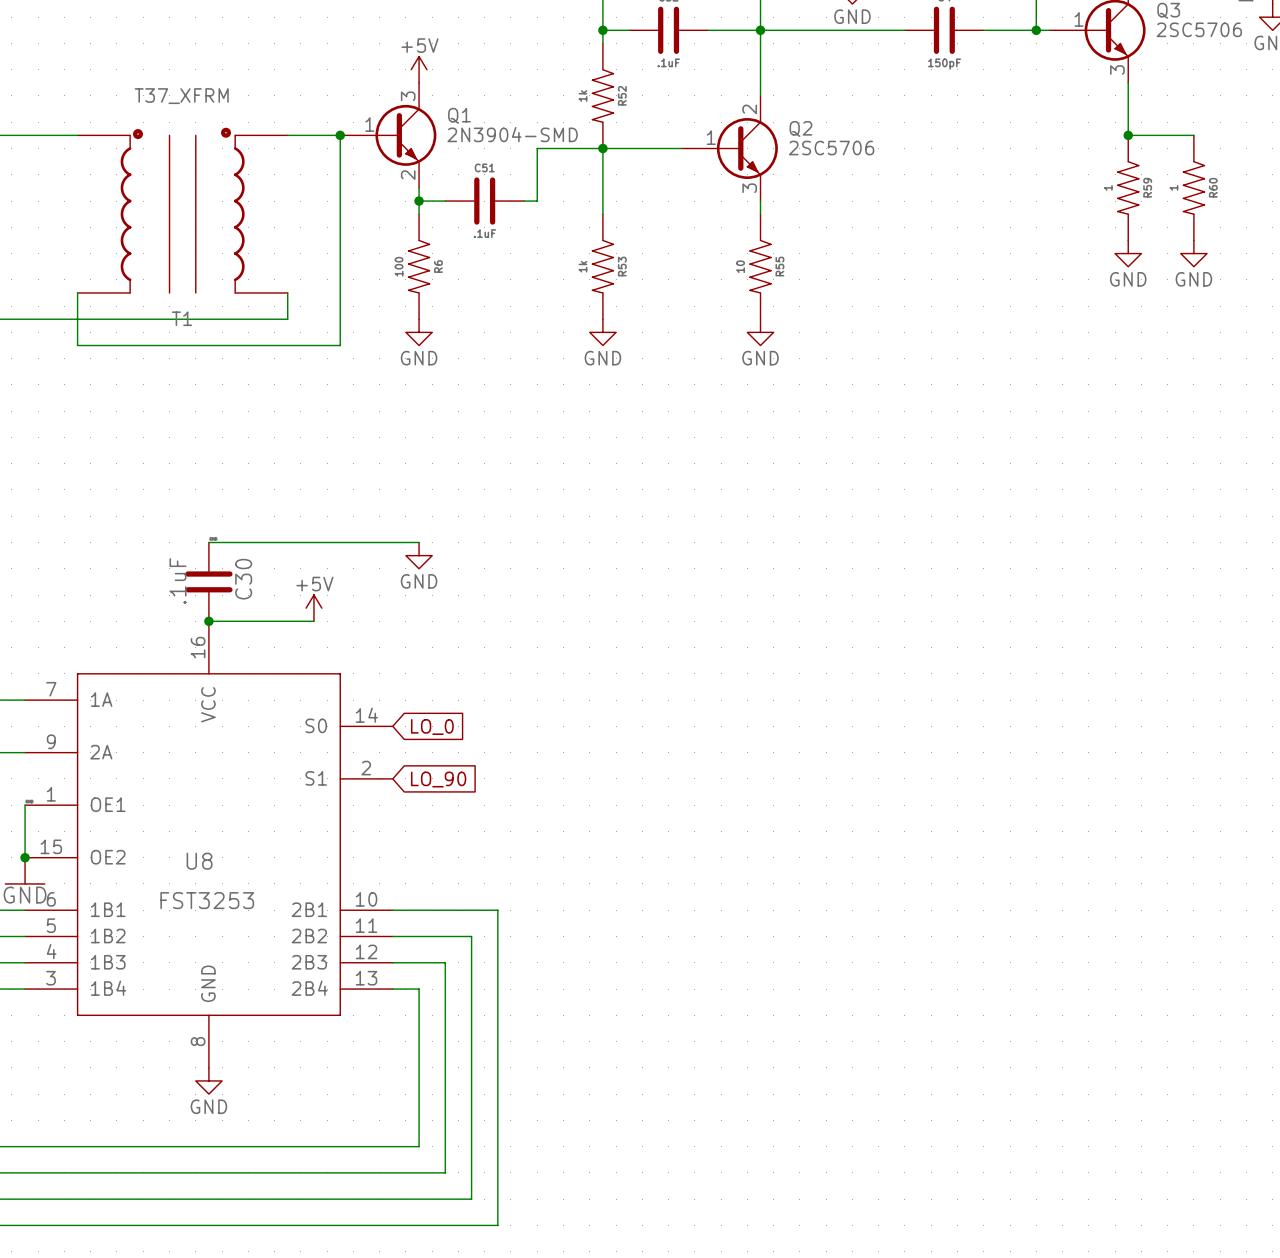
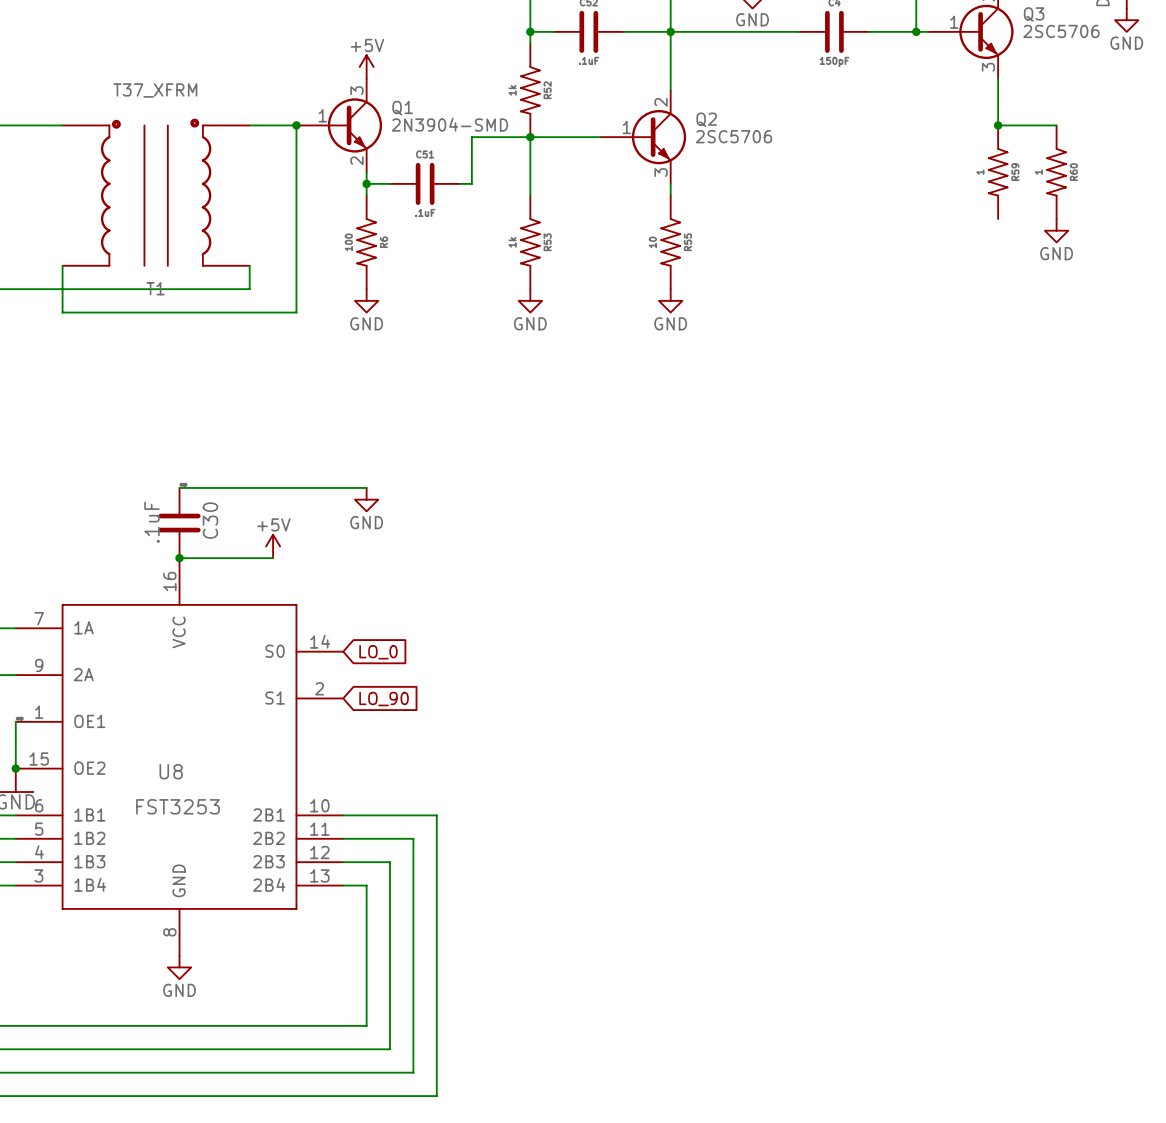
power symbol: GND (1128, 253) -> none

